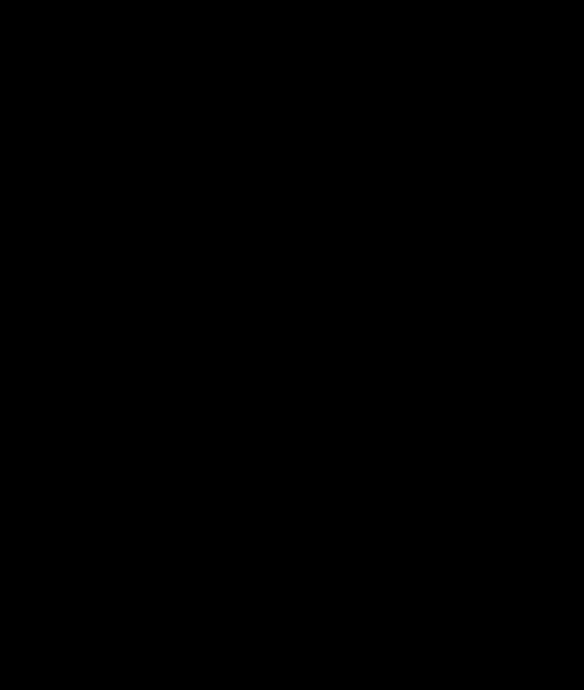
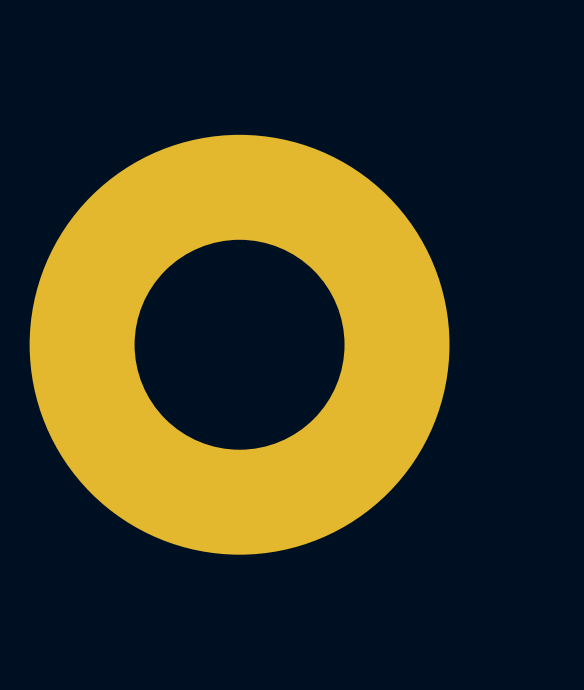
part: none -> (239, 344)

